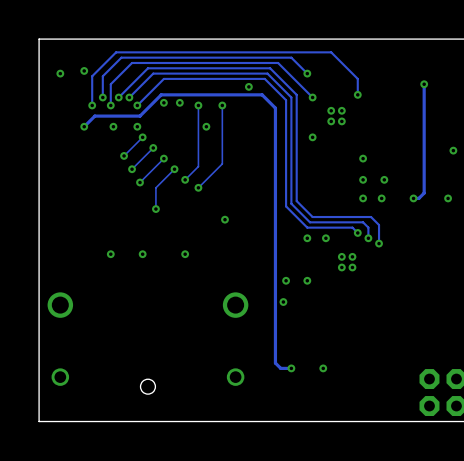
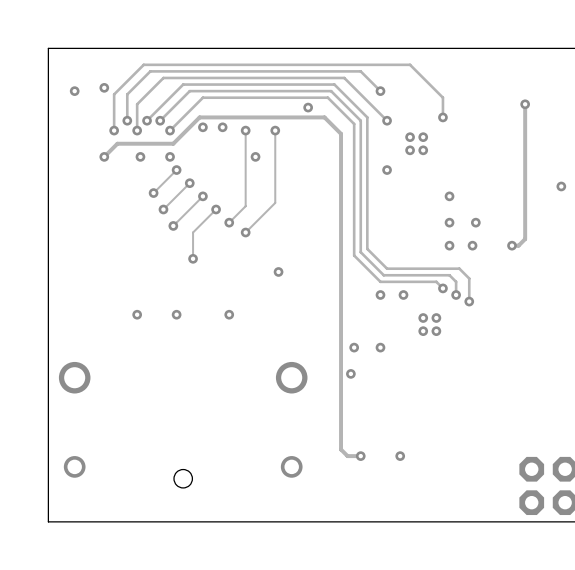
via: (448, 198) -> none

